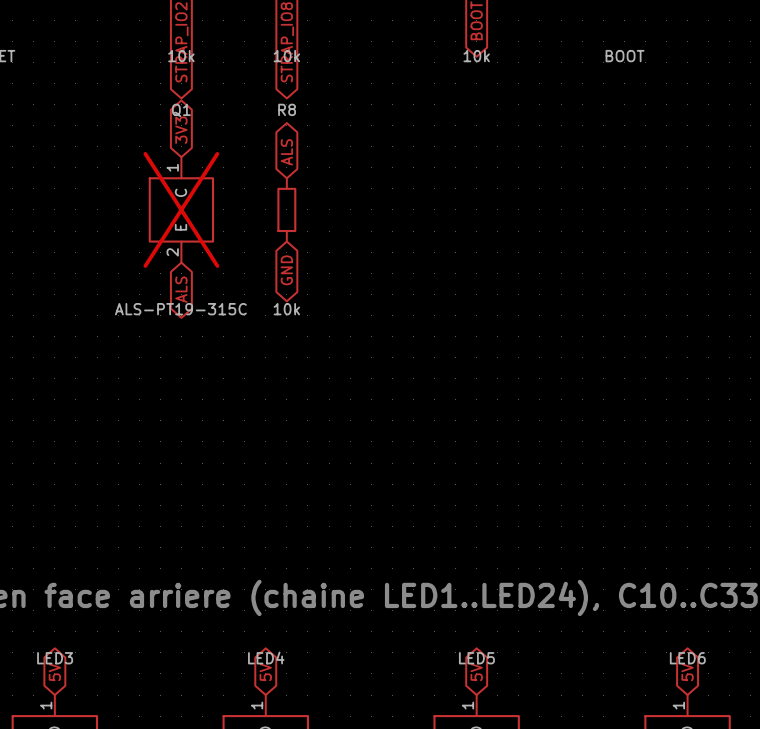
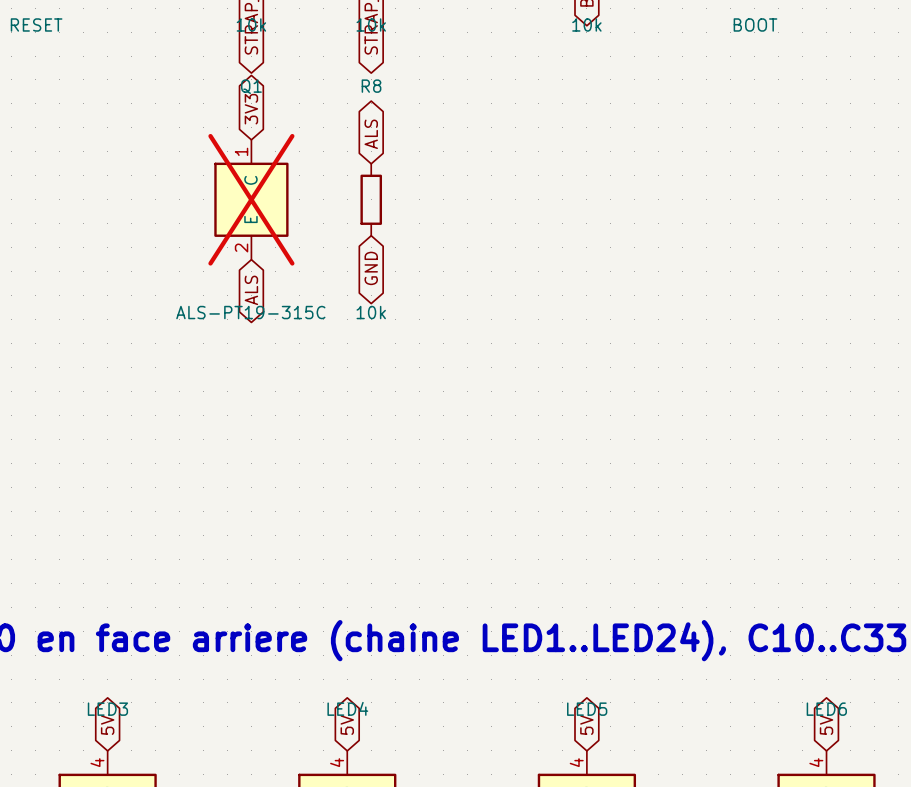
LED3 pin number: 1 (46, 705) -> 4 (97, 762)
LED4 pin number: 1 (257, 705) -> 4 (337, 762)
LED5 pin number: 1 (467, 705) -> 4 (576, 762)
LED6 pin number: 1 (678, 705) -> 4 (816, 762)

